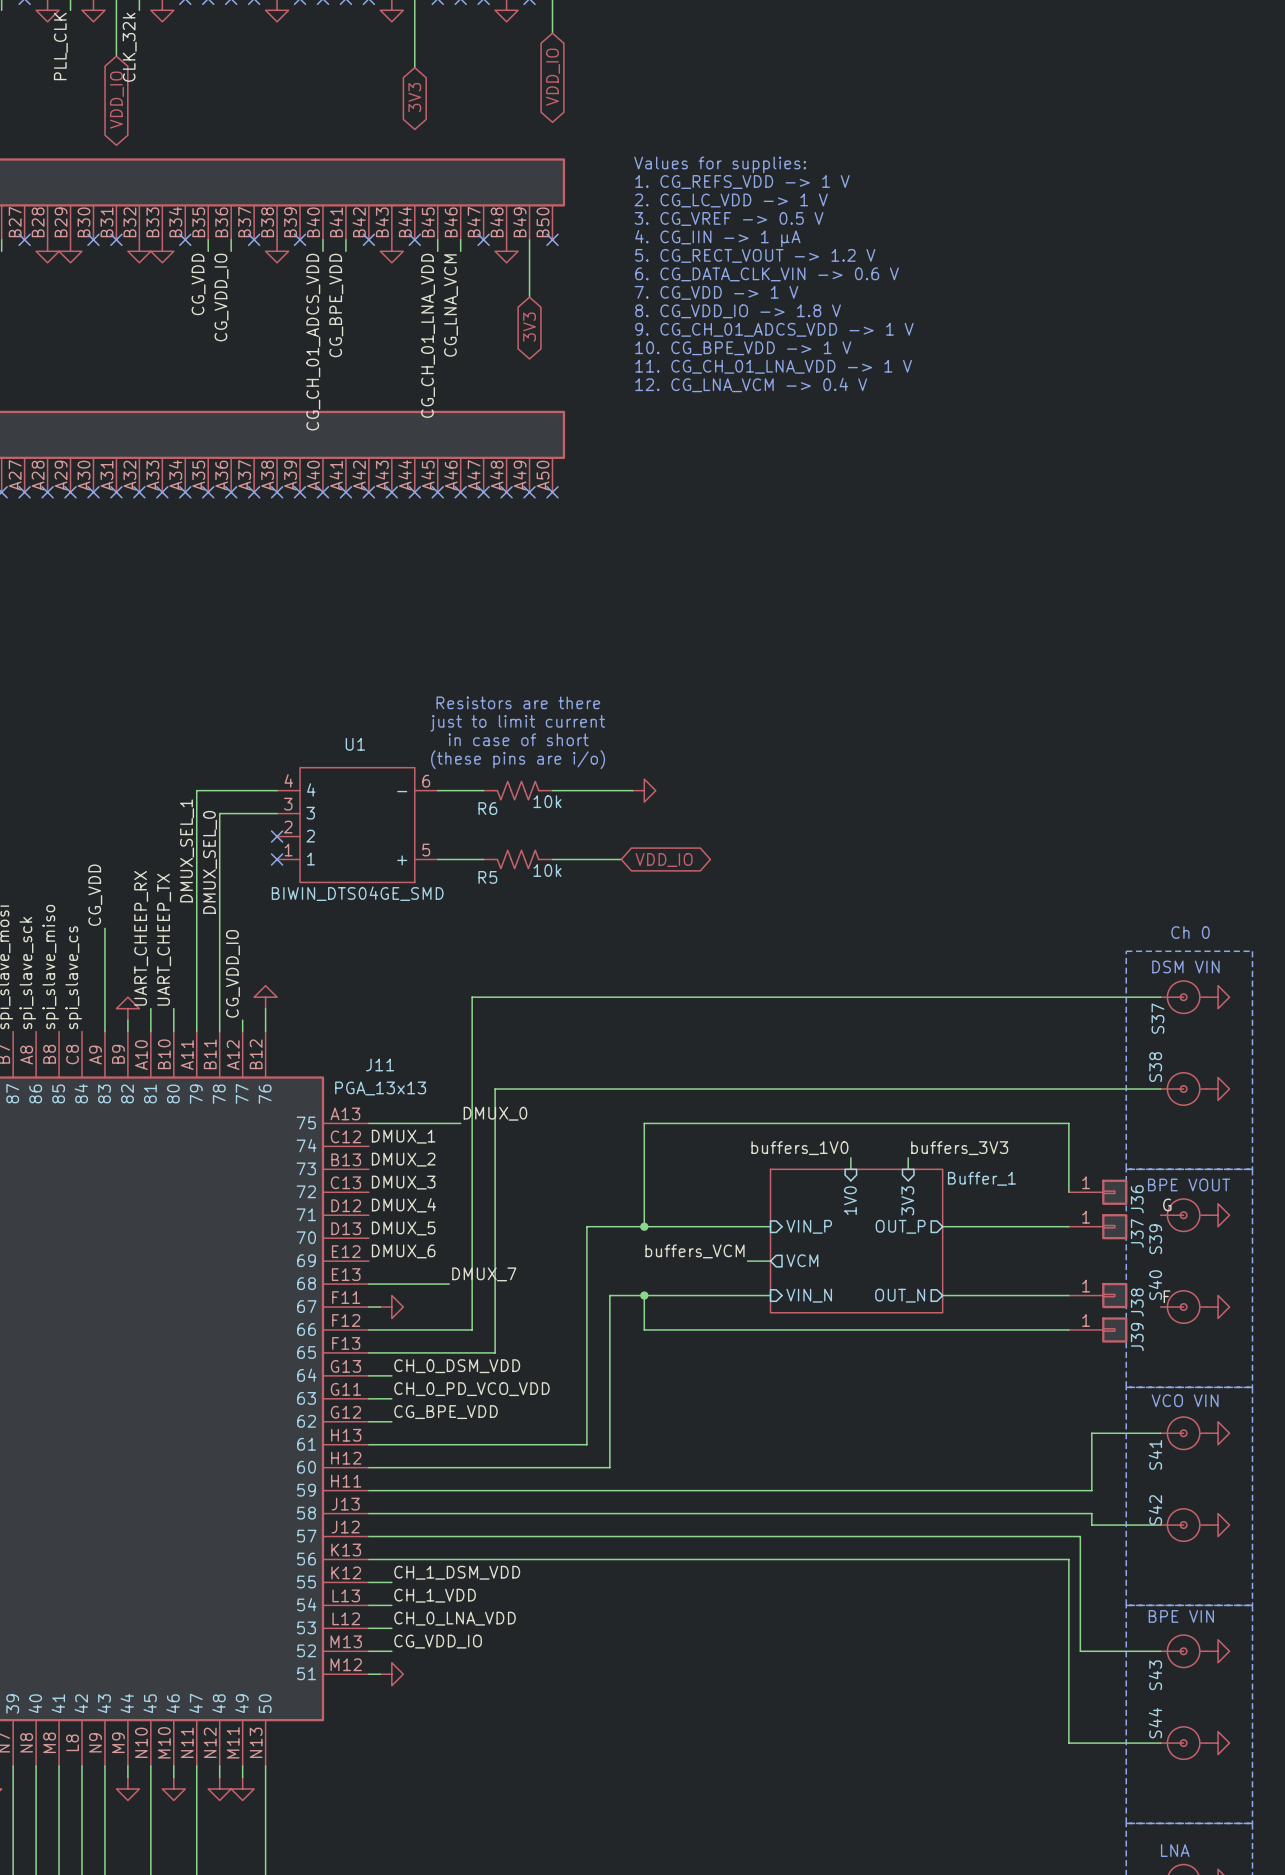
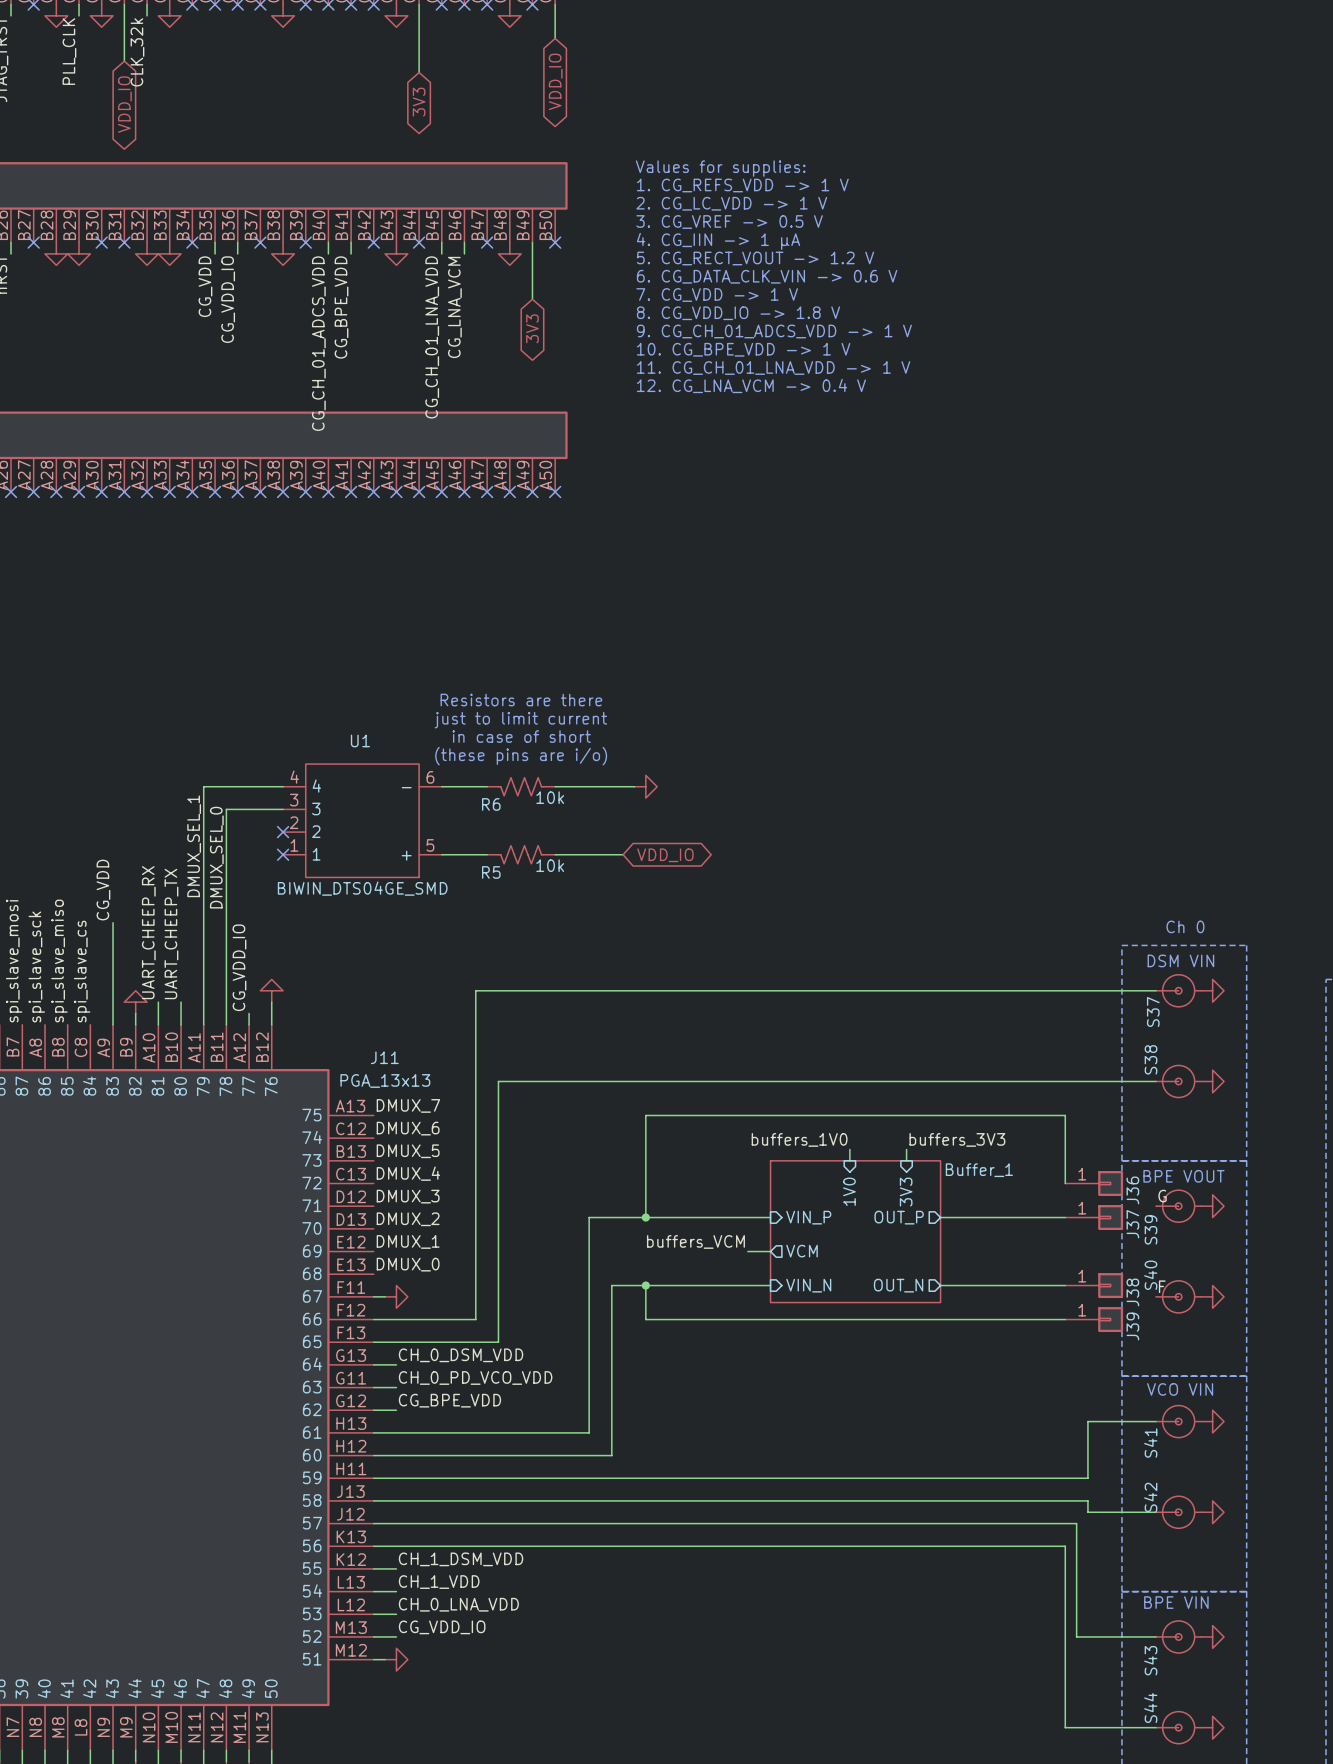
label position: DMUX_0 (495, 1113) -> DMUX_0 (408, 1264)
wire: (368, 1123) (460, 1123) -> none
label: DMUX_1 (403, 1136) -> DMUX_6 (408, 1128)
label: DMUX_2 (403, 1159) -> DMUX_5 (408, 1151)
label: DMUX_3 (403, 1182) -> DMUX_4 (408, 1173)
label: DMUX_4 (403, 1205) -> DMUX_3 (408, 1196)
label: DMUX_5 (403, 1228) -> DMUX_2 (408, 1219)
label: DMUX_6 (403, 1251) -> DMUX_1 (408, 1241)
label position: DMUX_7 (484, 1274) -> DMUX_7 (408, 1105)
wire: (368, 1284) (449, 1284) -> none

